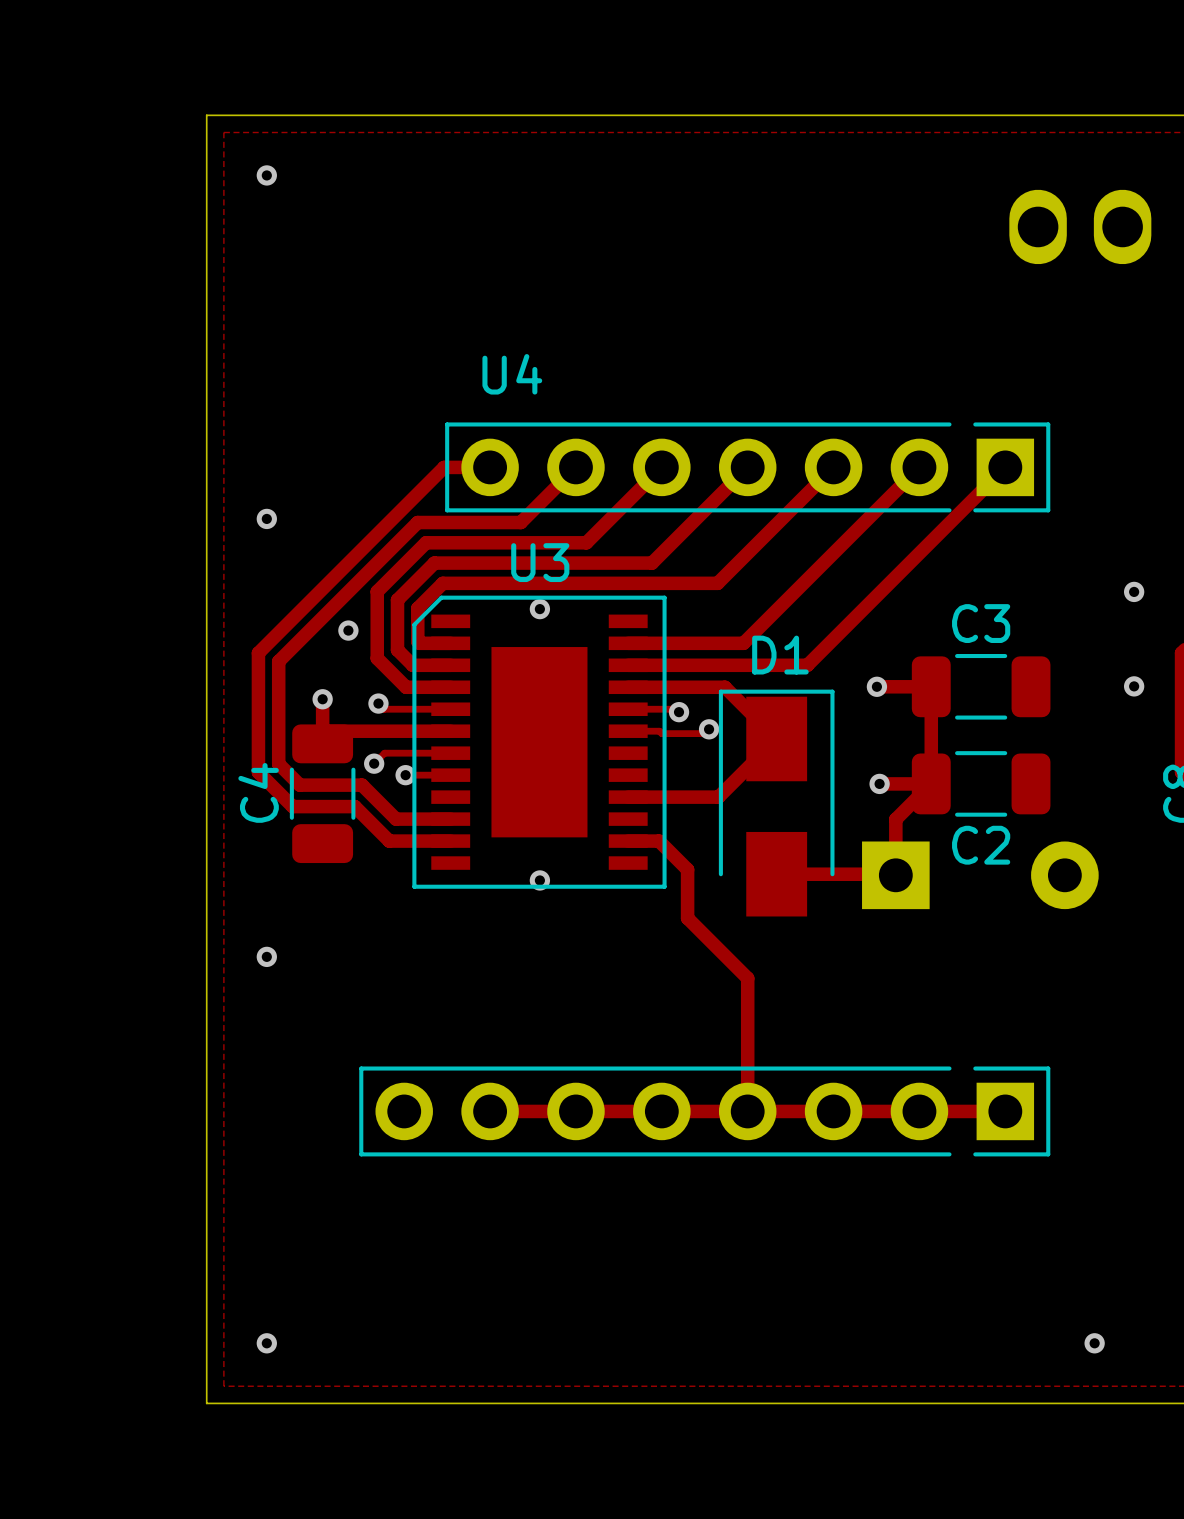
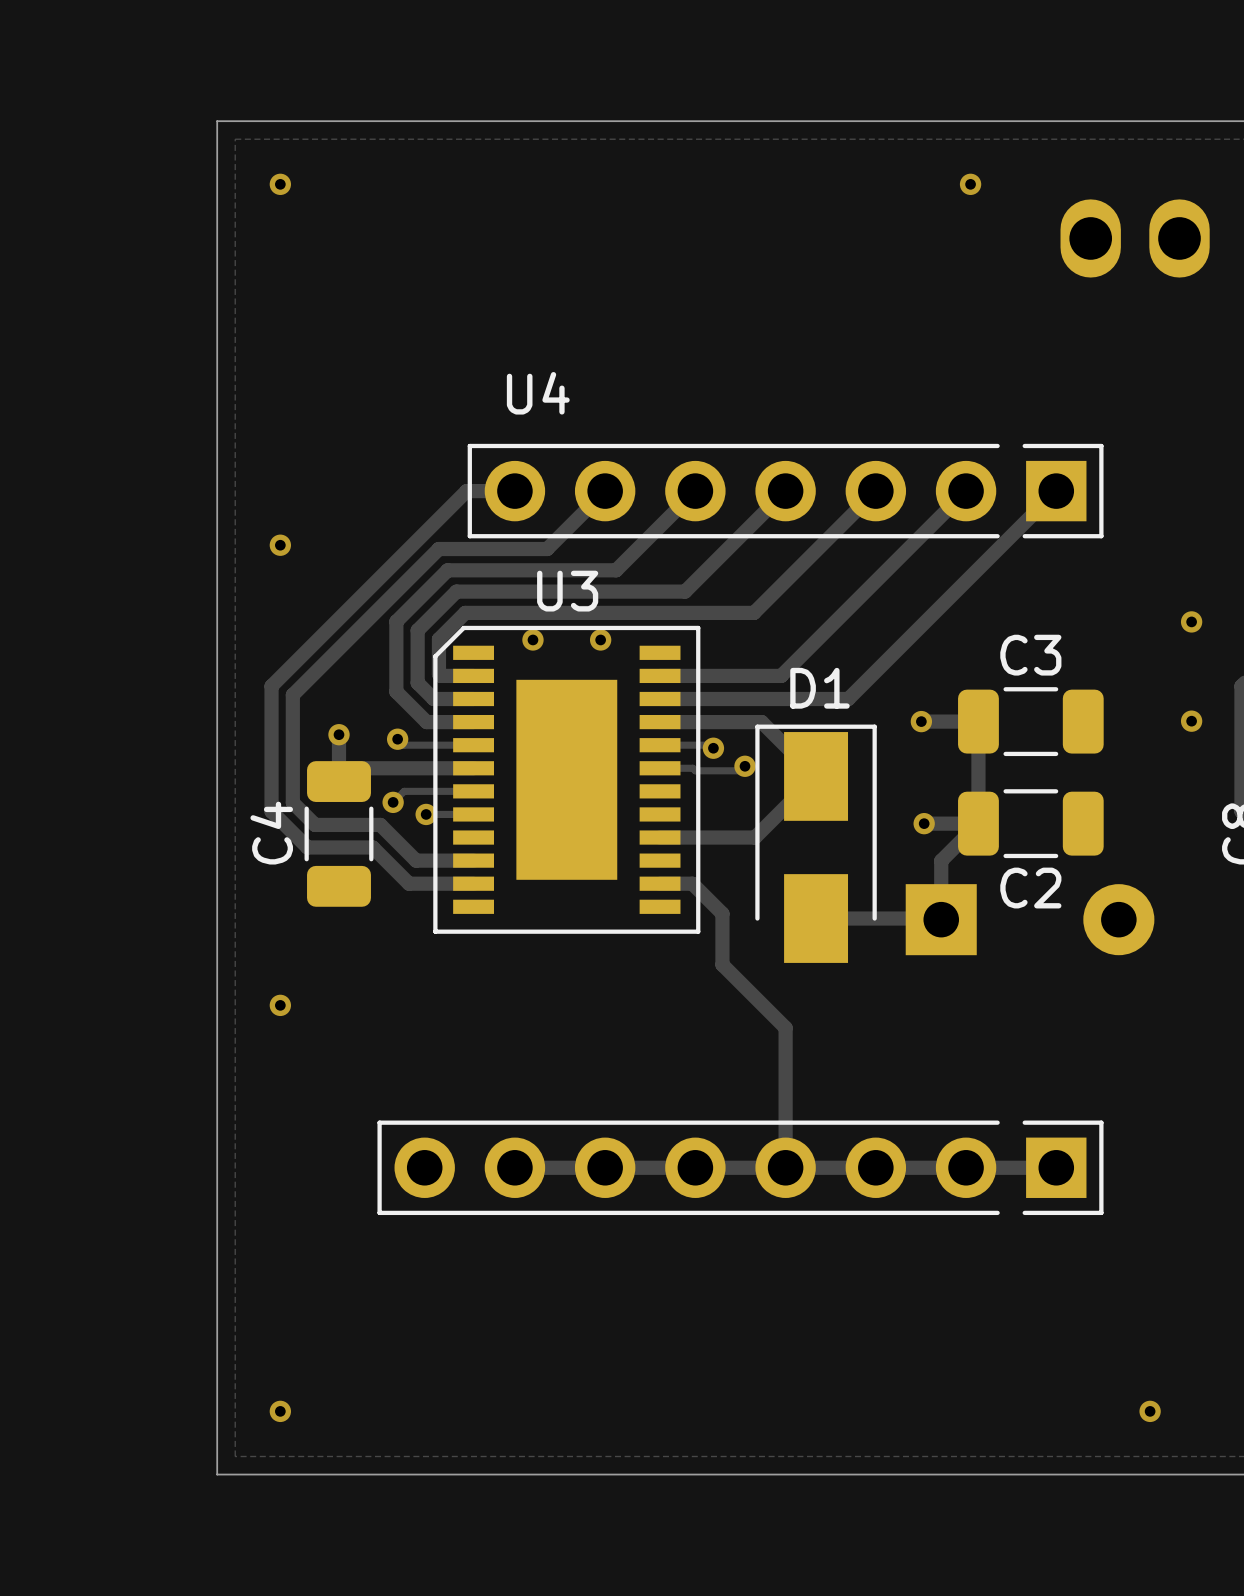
via: none -> (970, 184)
via: none -> (532, 639)
via: (539, 609) -> none
via: none -> (600, 639)
via: (348, 630) -> none
via: (539, 880) -> none

